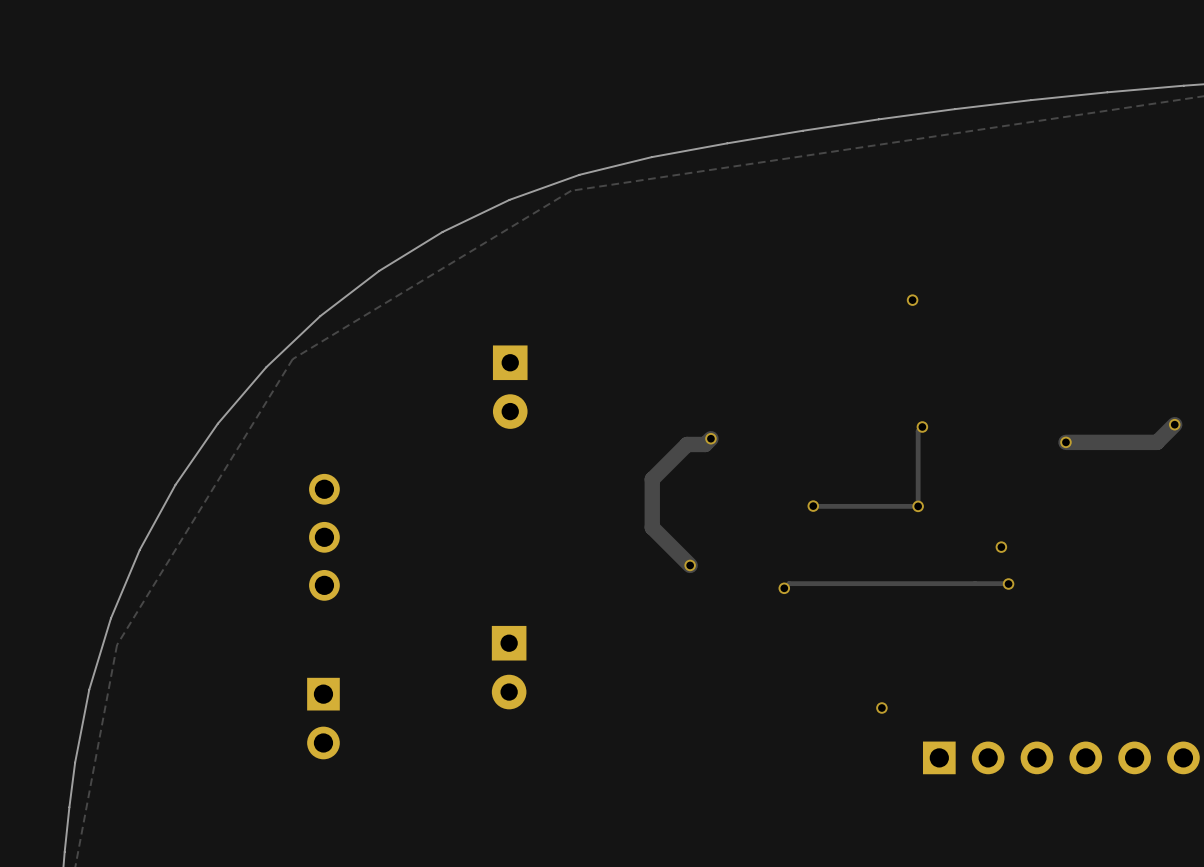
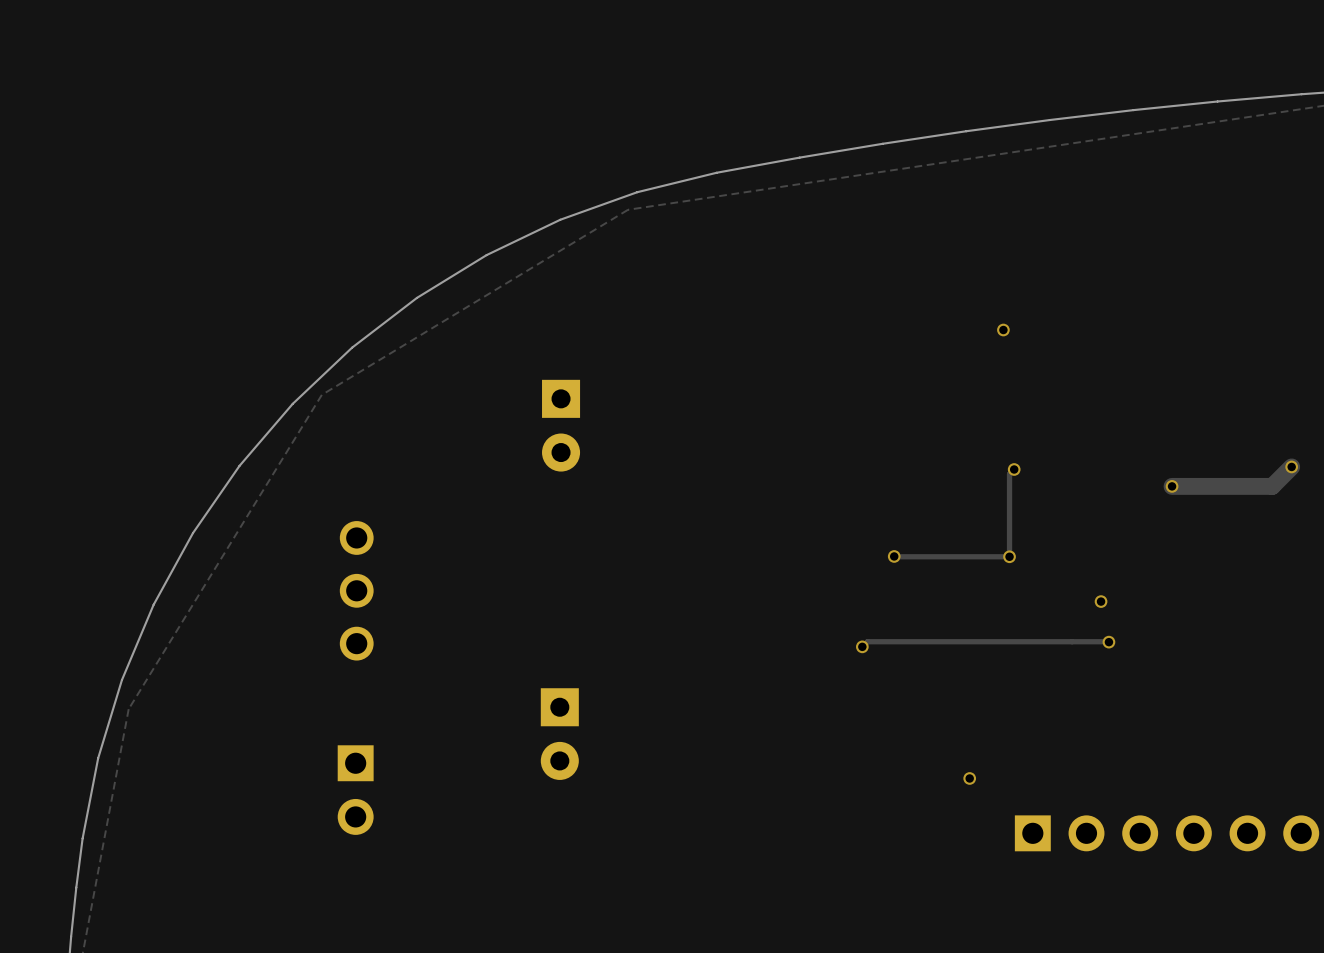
track: (710, 438) (705, 444) (687, 444) (652, 479) (652, 527) (690, 565) -> none
via: (710, 438) -> none
via: (690, 565) -> none

